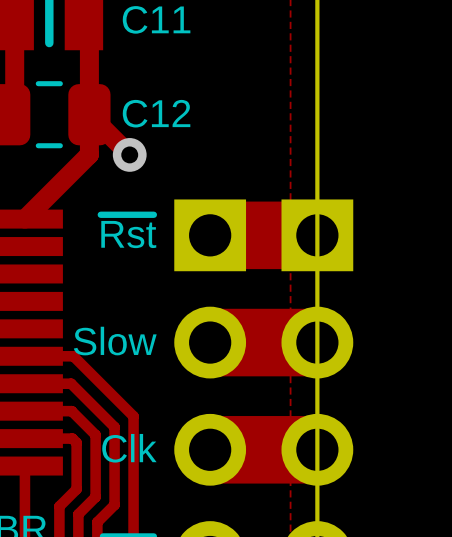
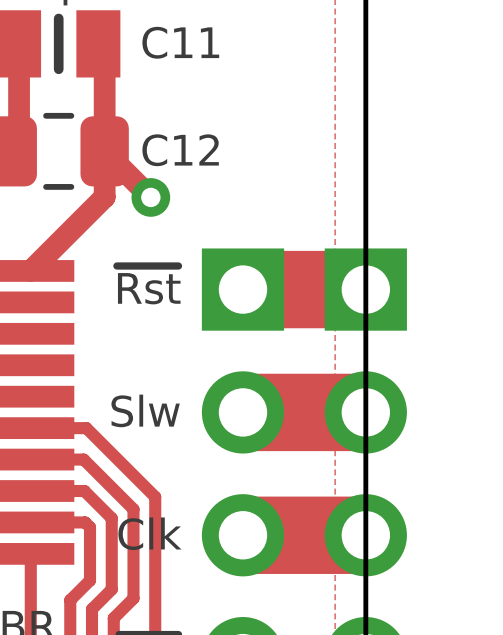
text: Slow (115, 341) -> Slw (145, 410)

